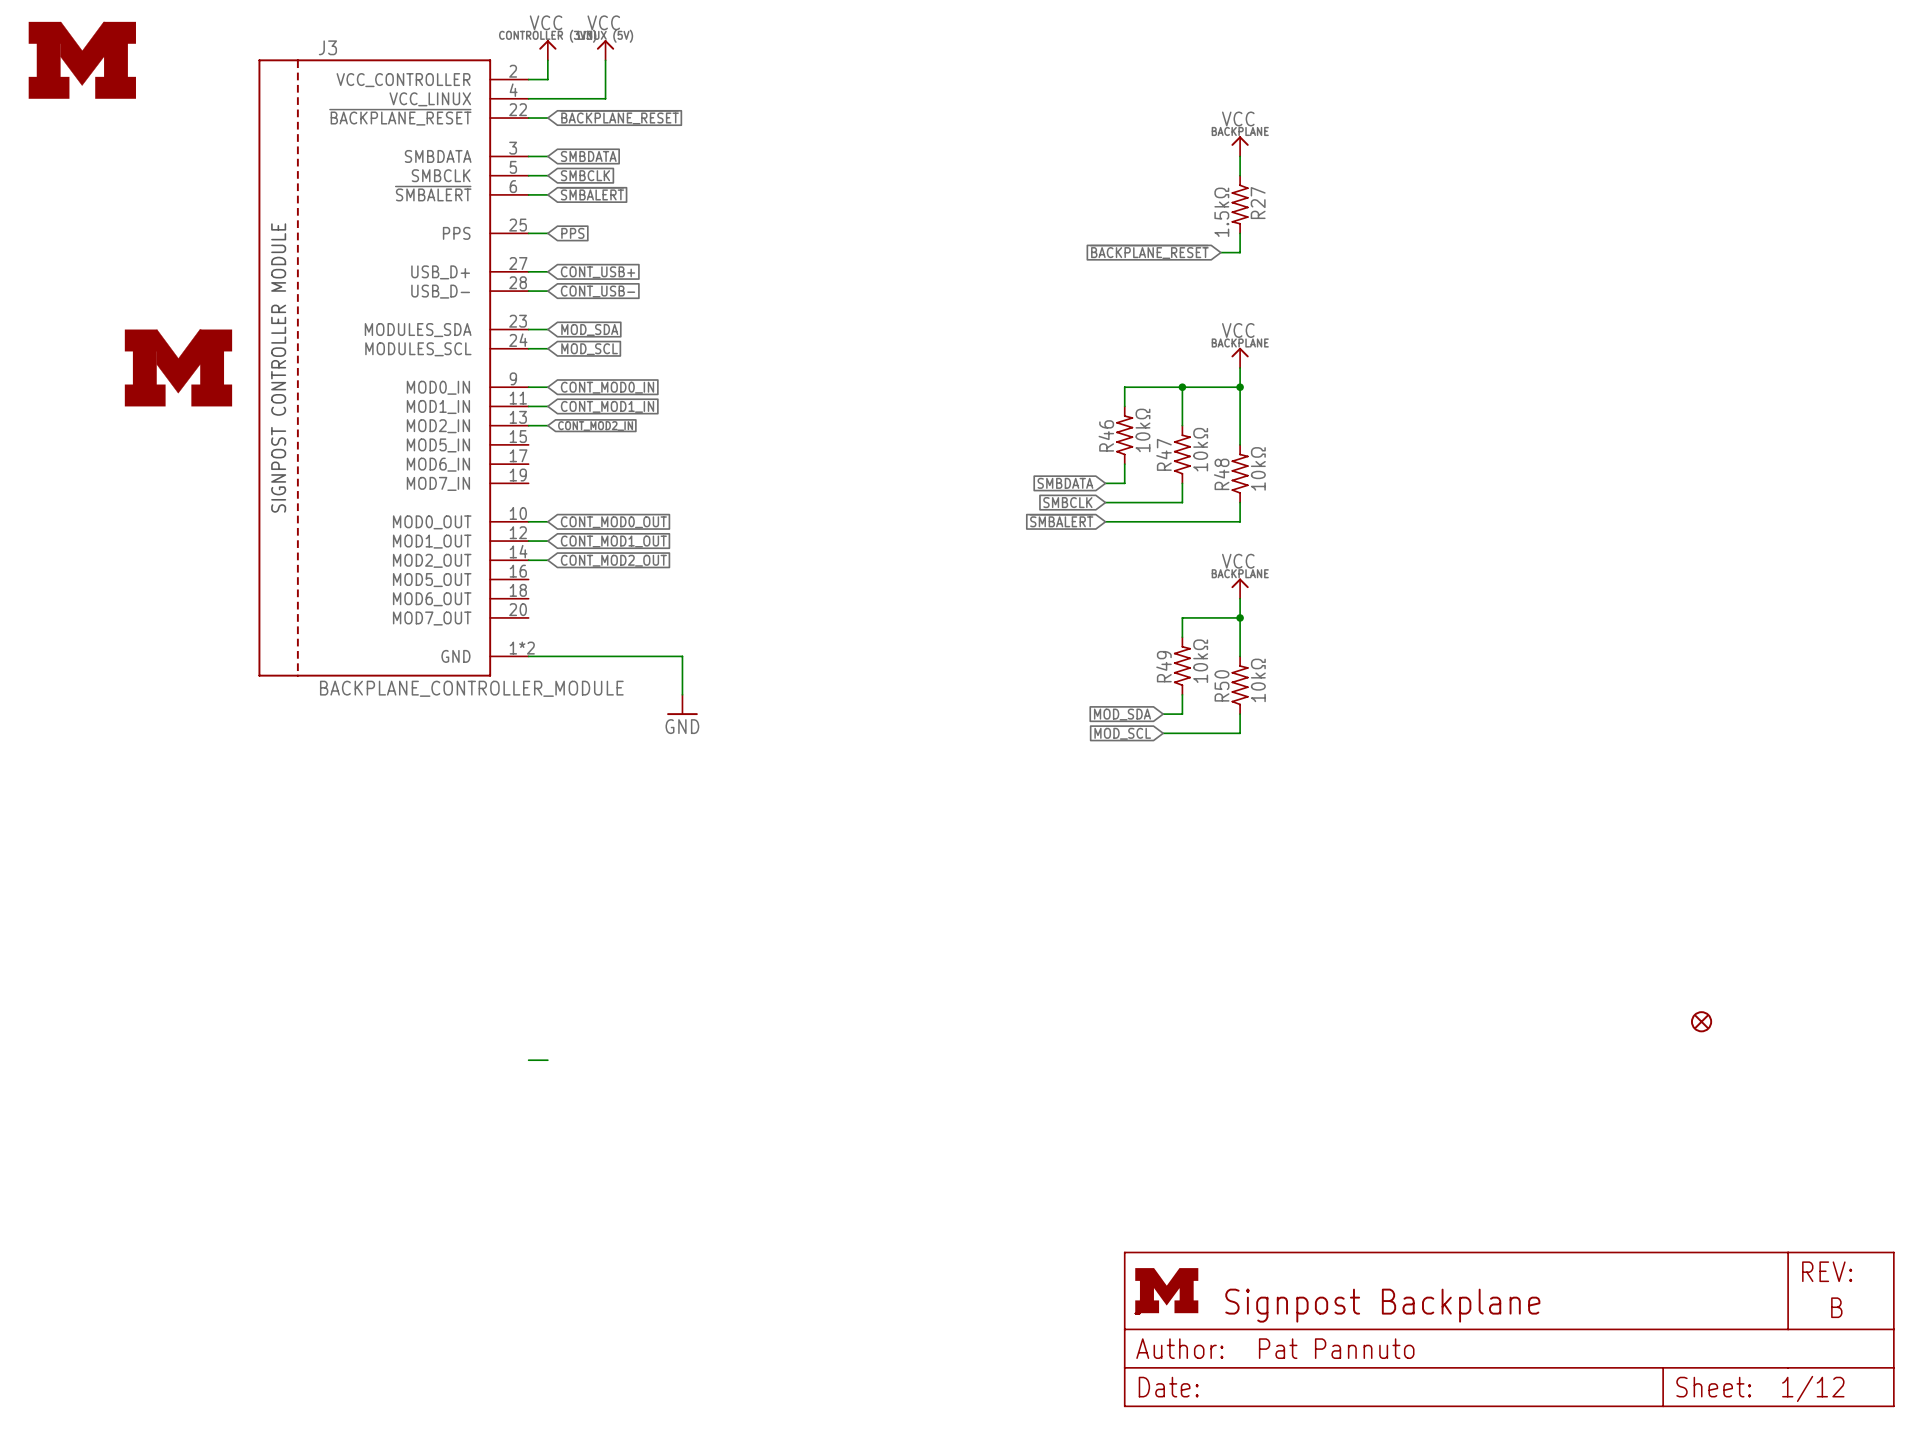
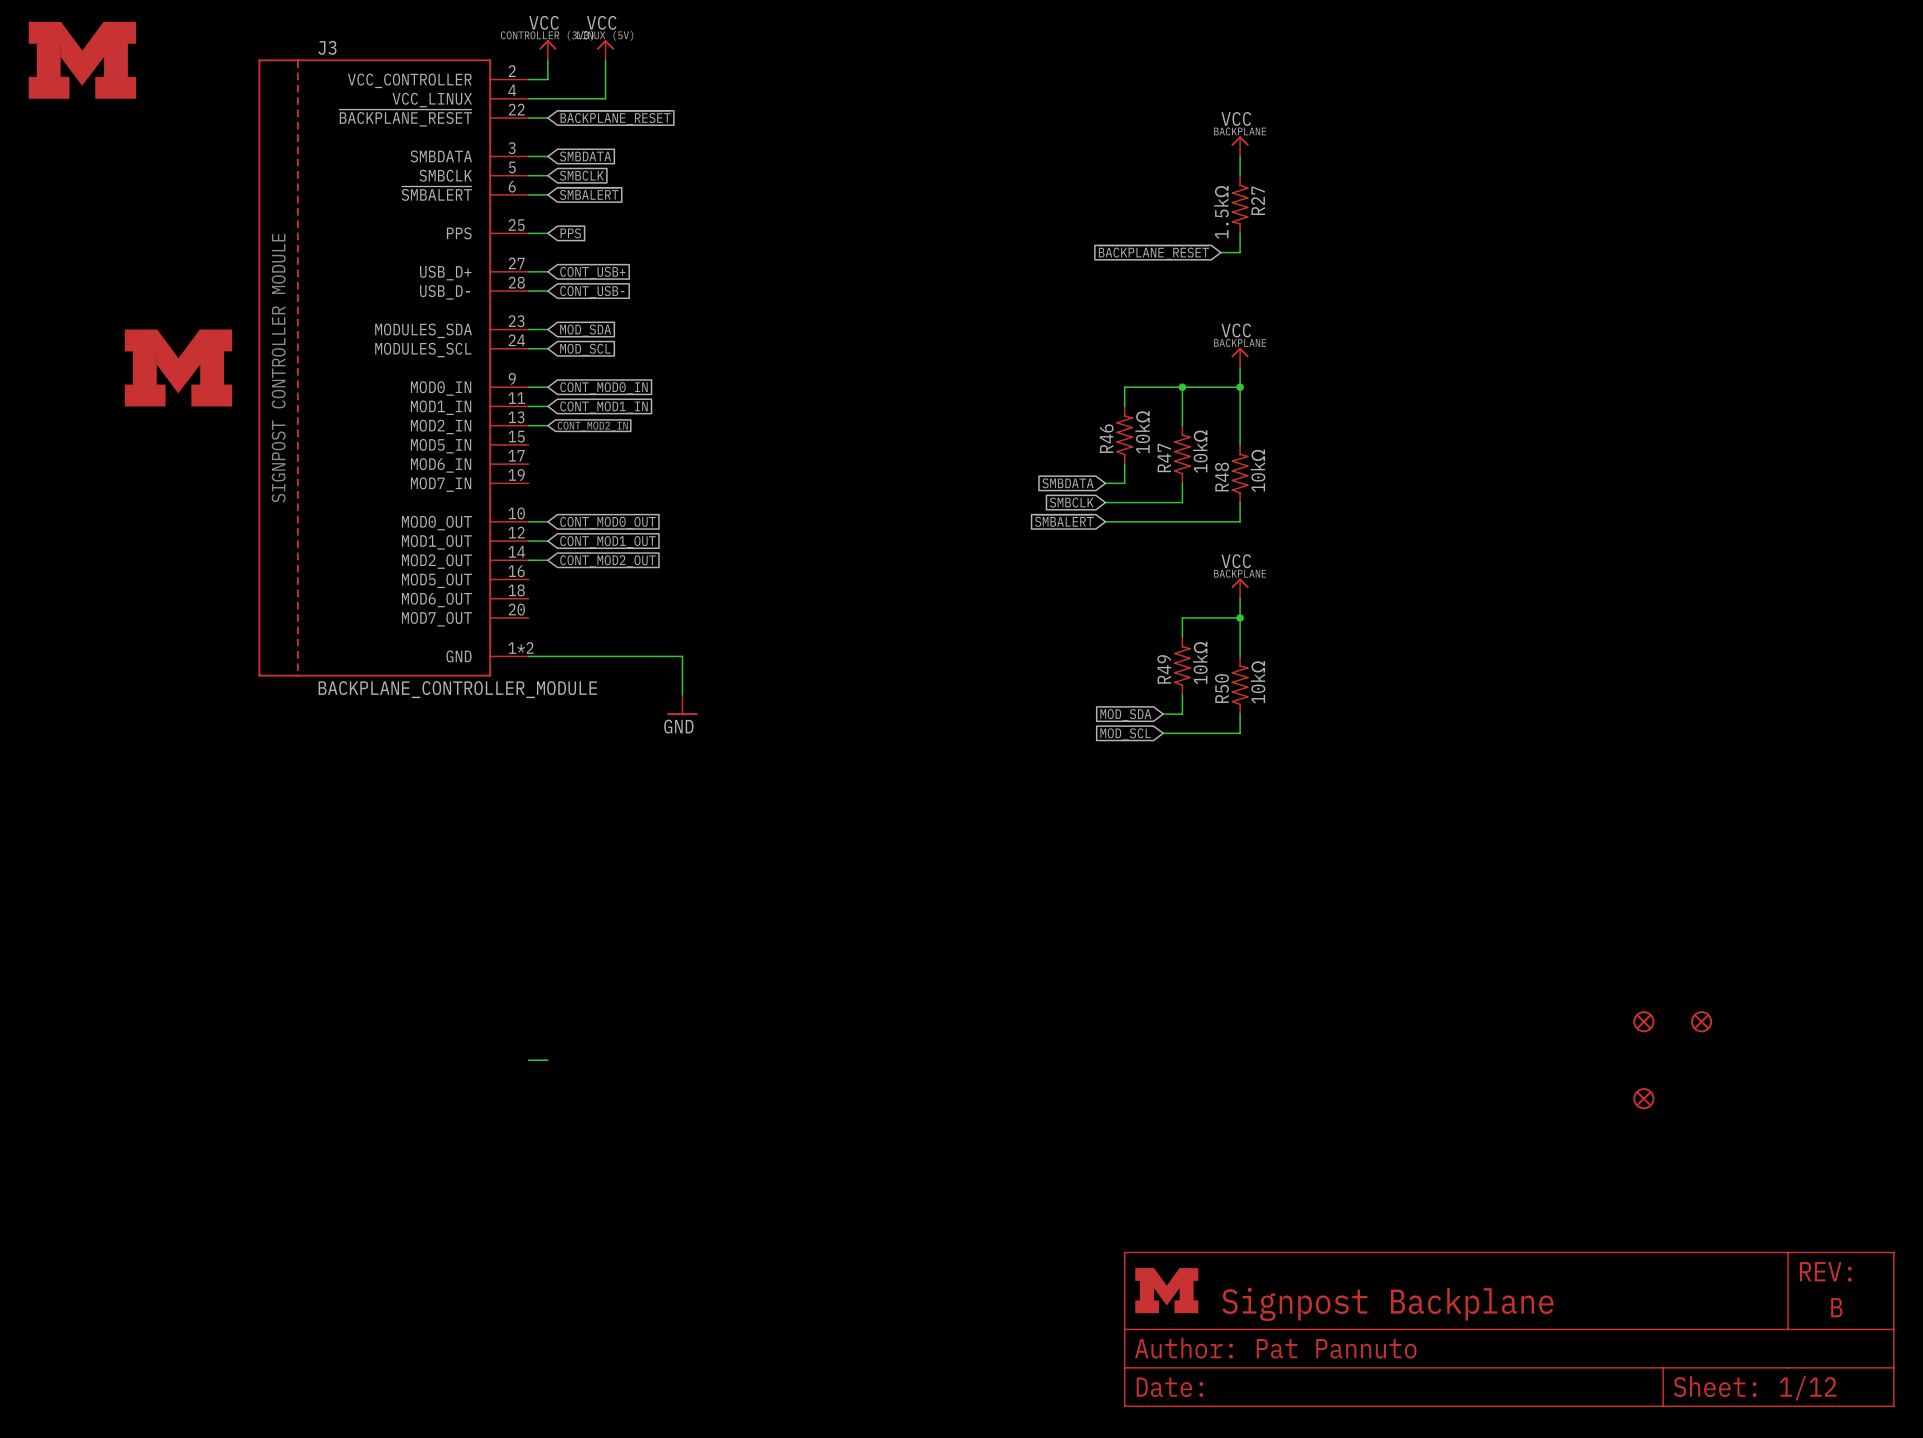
part: none -> (1643, 1021)
part: none -> (1643, 1098)

